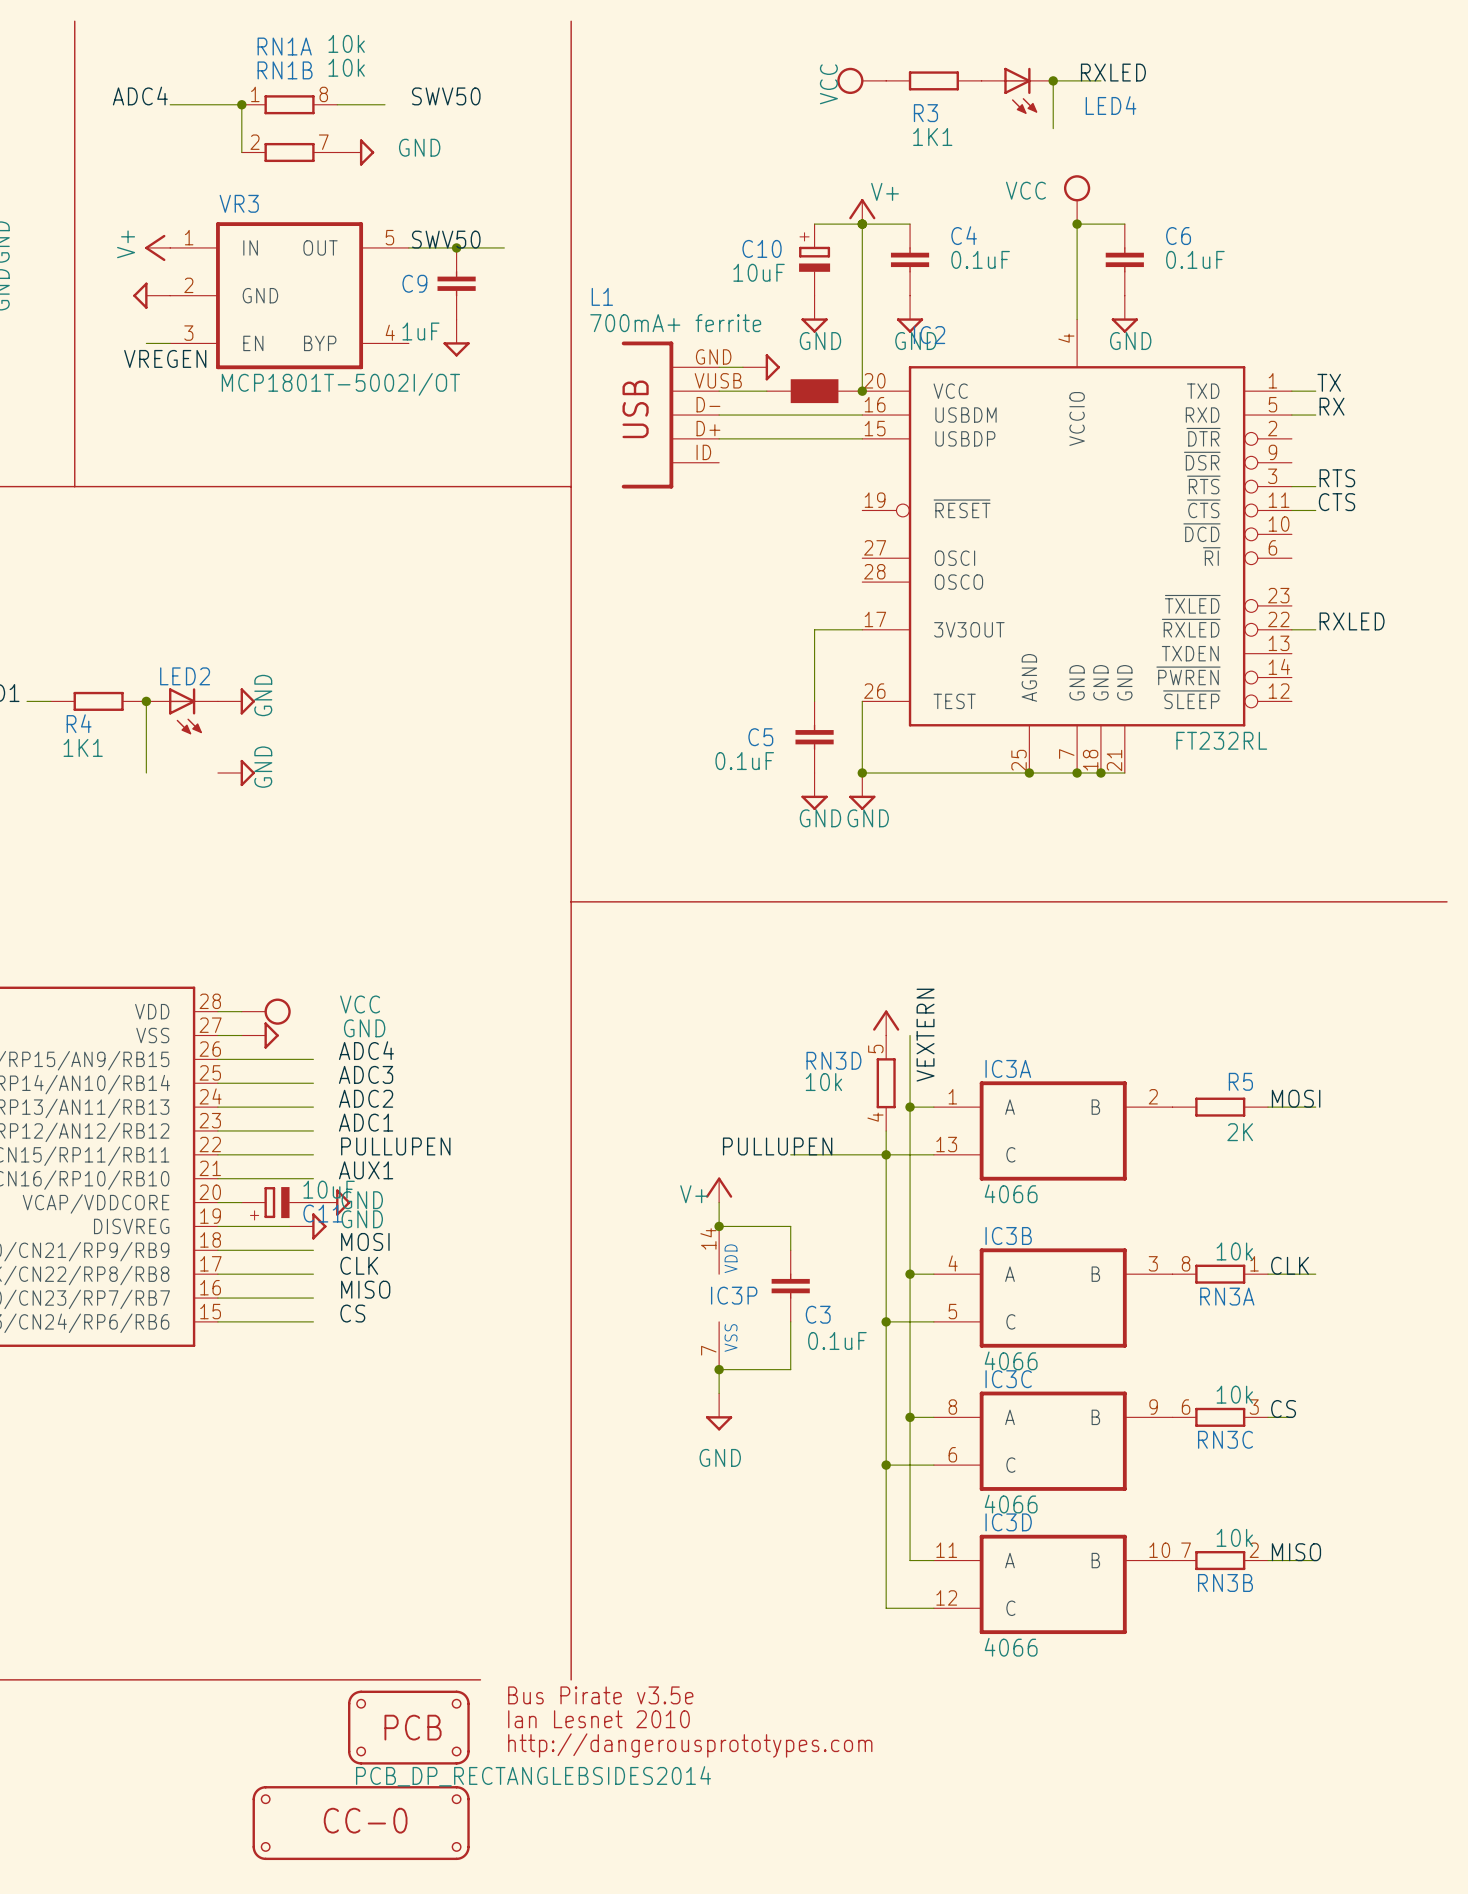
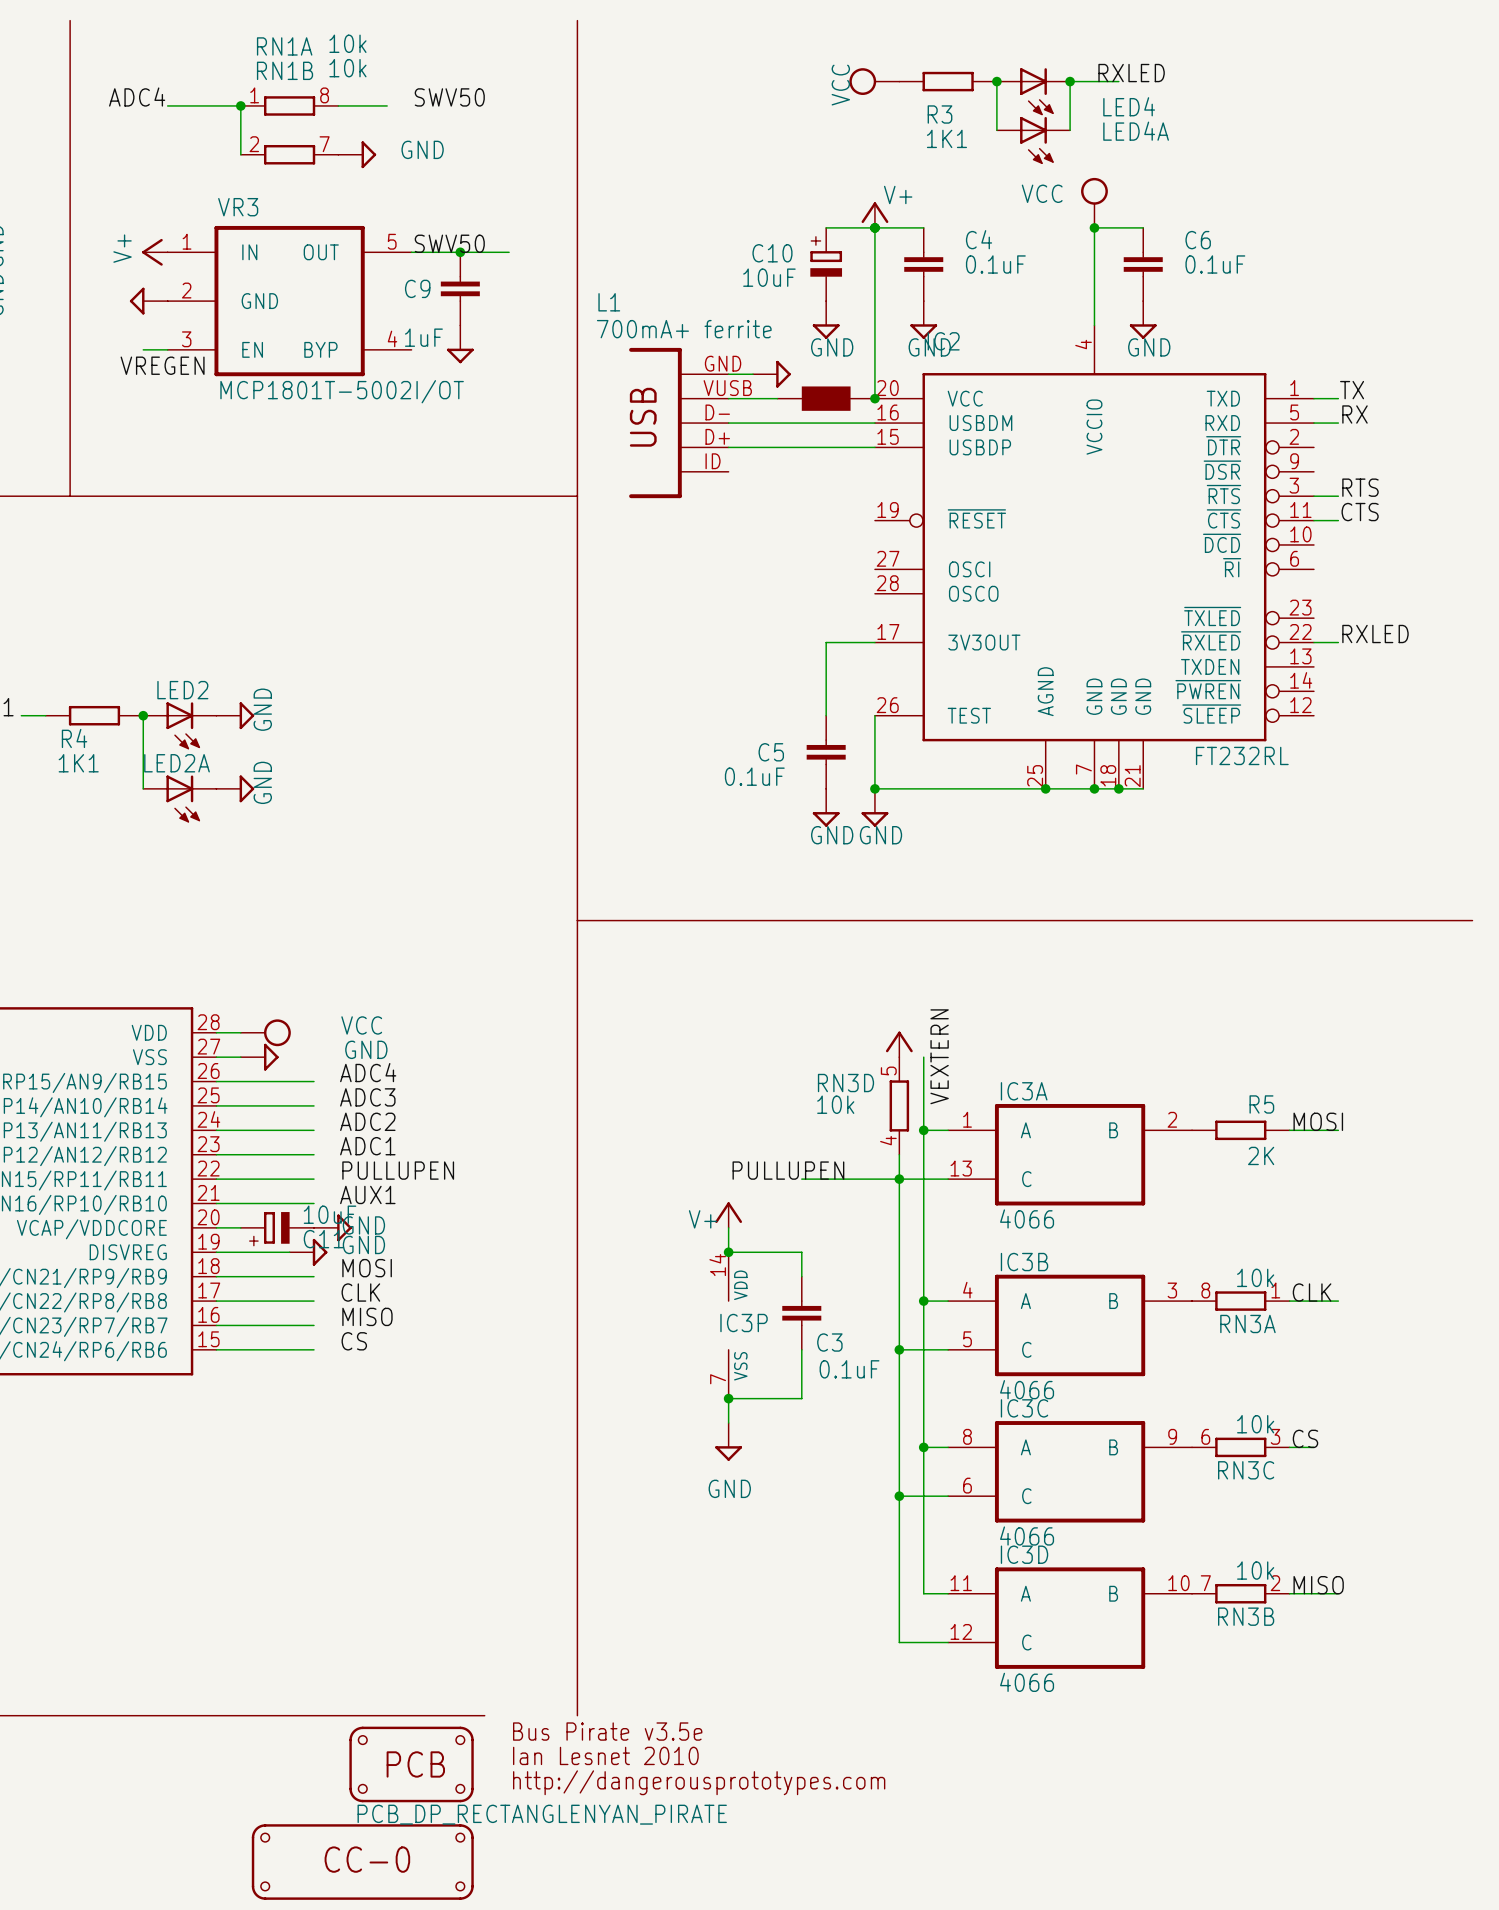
wire: none -> (996, 81) (996, 130)
junction: none -> (996, 81)
LED4A: none -> (1033, 140)
LED2A: none -> (179, 799)
part value: PCB_DP_RECTANGLEBSIDES2014 (533, 1776) -> PCB_DP_RECTANGLENYAN_PIRATE (542, 1814)

